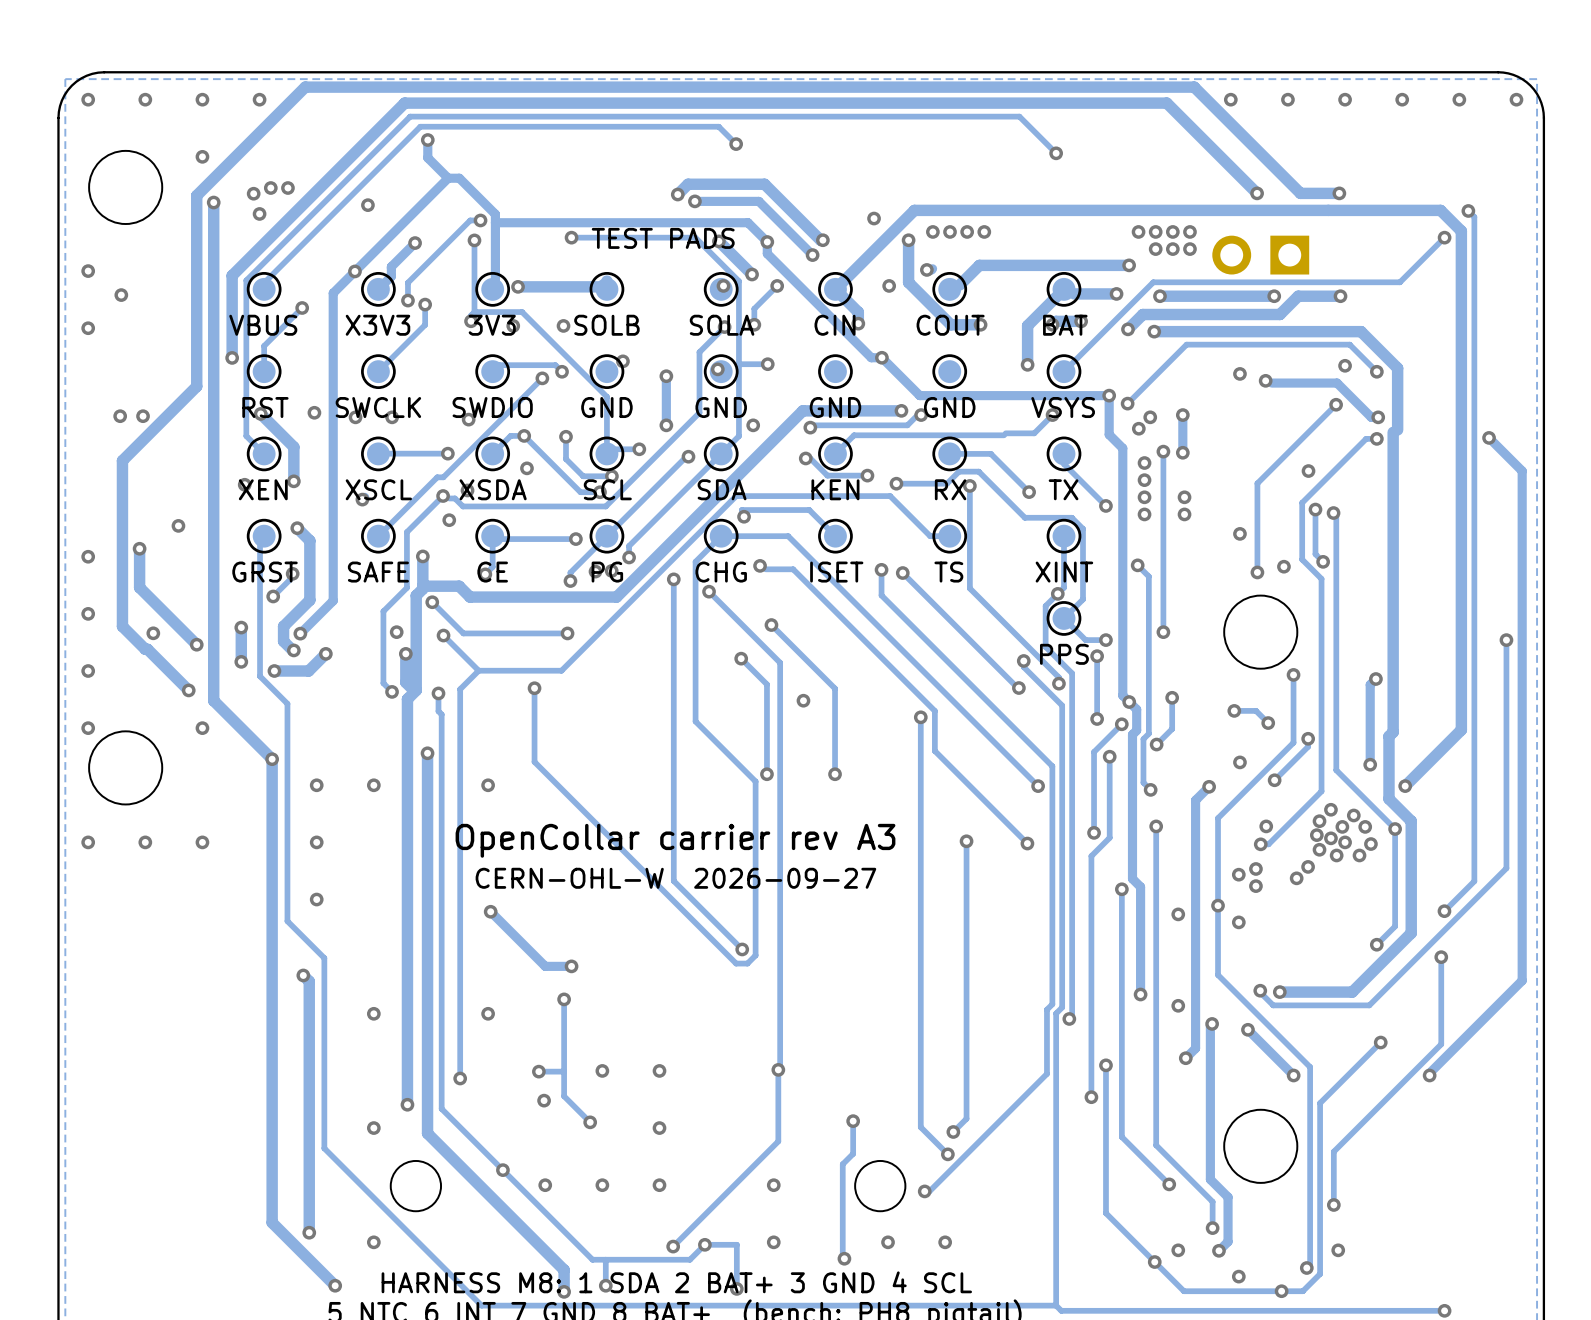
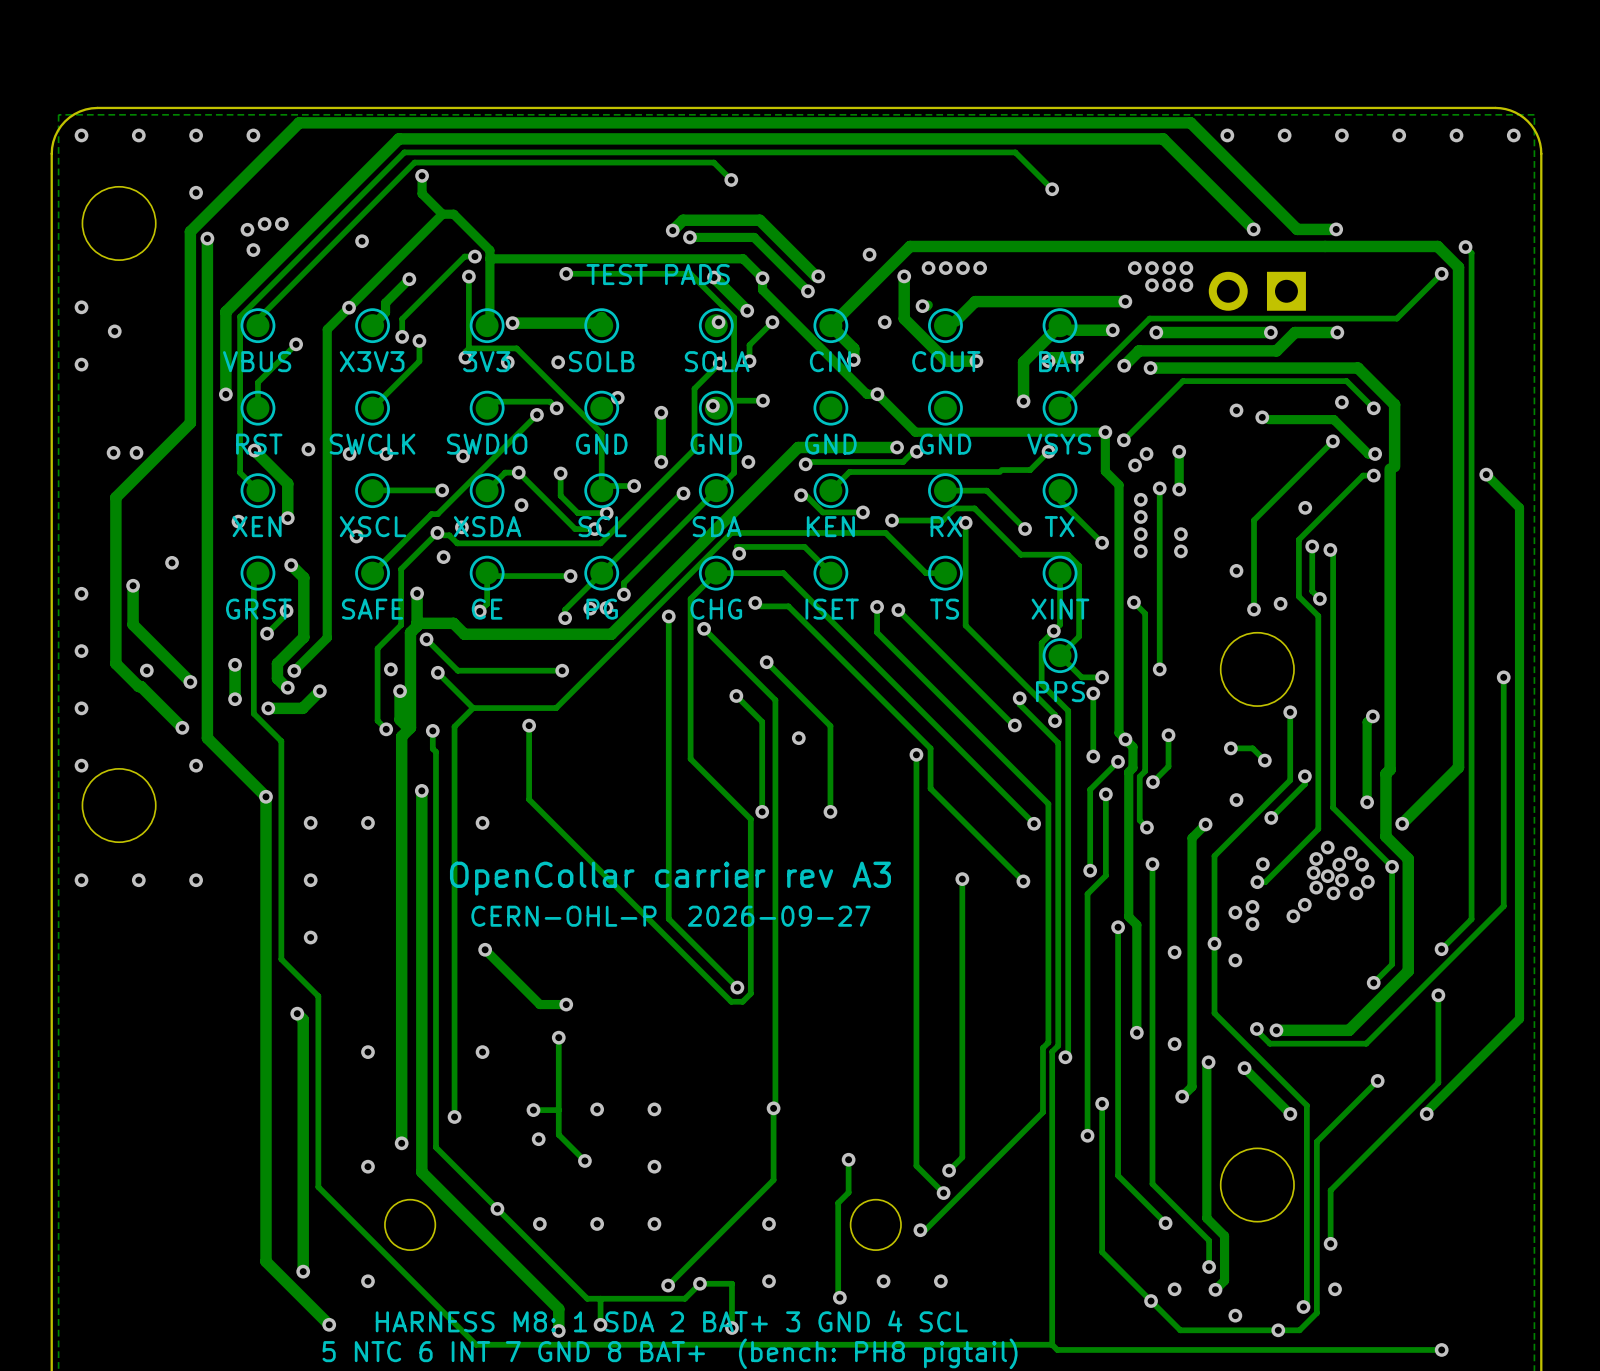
text: CERN-OHL-W 2026-09-27 (675, 878) -> CERN-OHL-P 2026-09-27 (670, 916)

